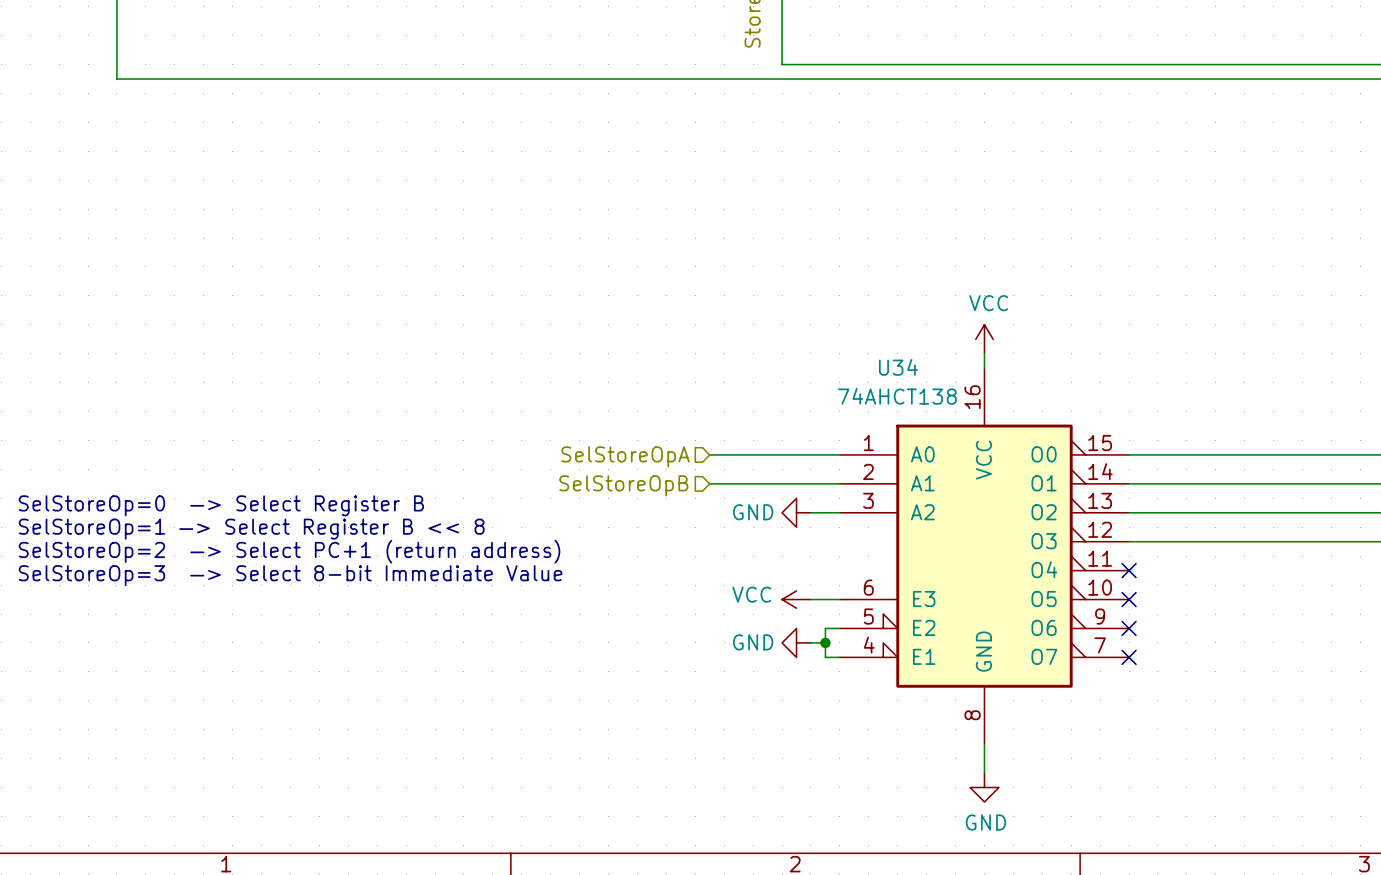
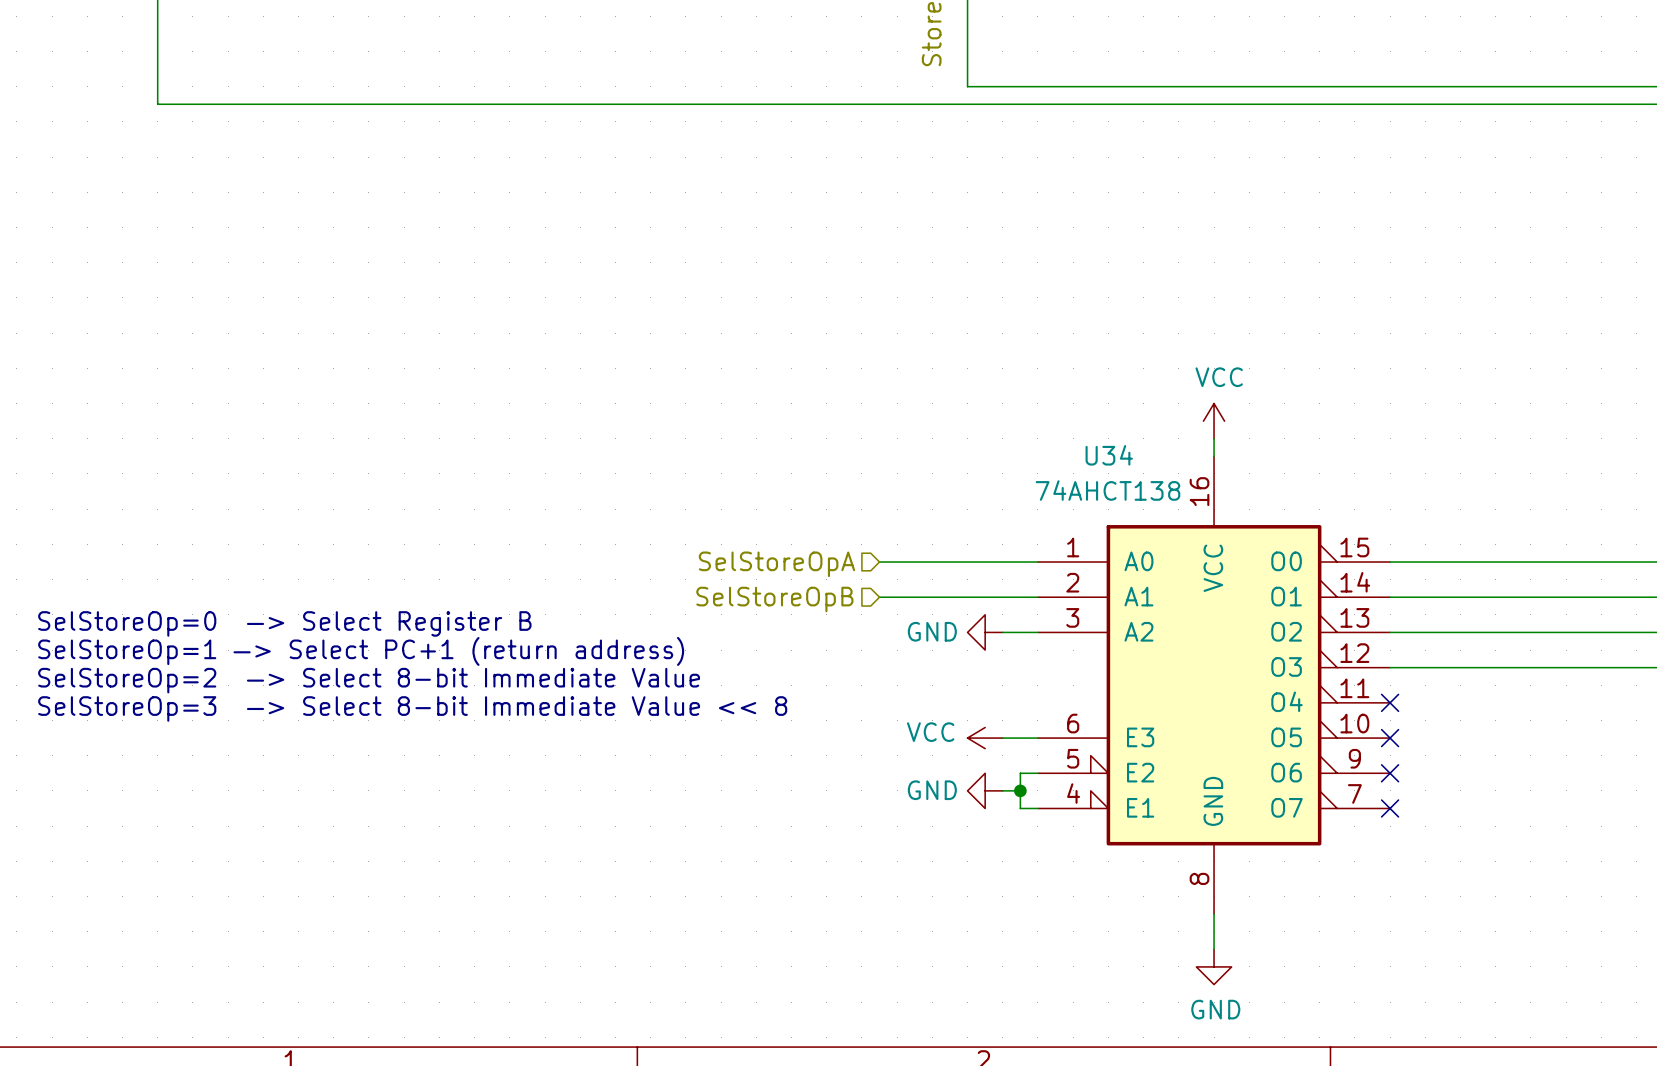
text: SelStoreOp=1 —> Select Register B << 8 (251, 529) -> SelStoreOp=1 —> Select PC+1 (return address) (361, 651)
text: SelStoreOp=2 —> Select PC+1 (return address) (289, 551) -> SelStoreOp=2 —> Select 8-bit Immediate Value (369, 680)
text: SelStoreOp=3 —> Select 8-bit Immediate Value (290, 575) -> SelStoreOp=3 —> Select 8-bit Immediate Value << 8 (412, 708)

